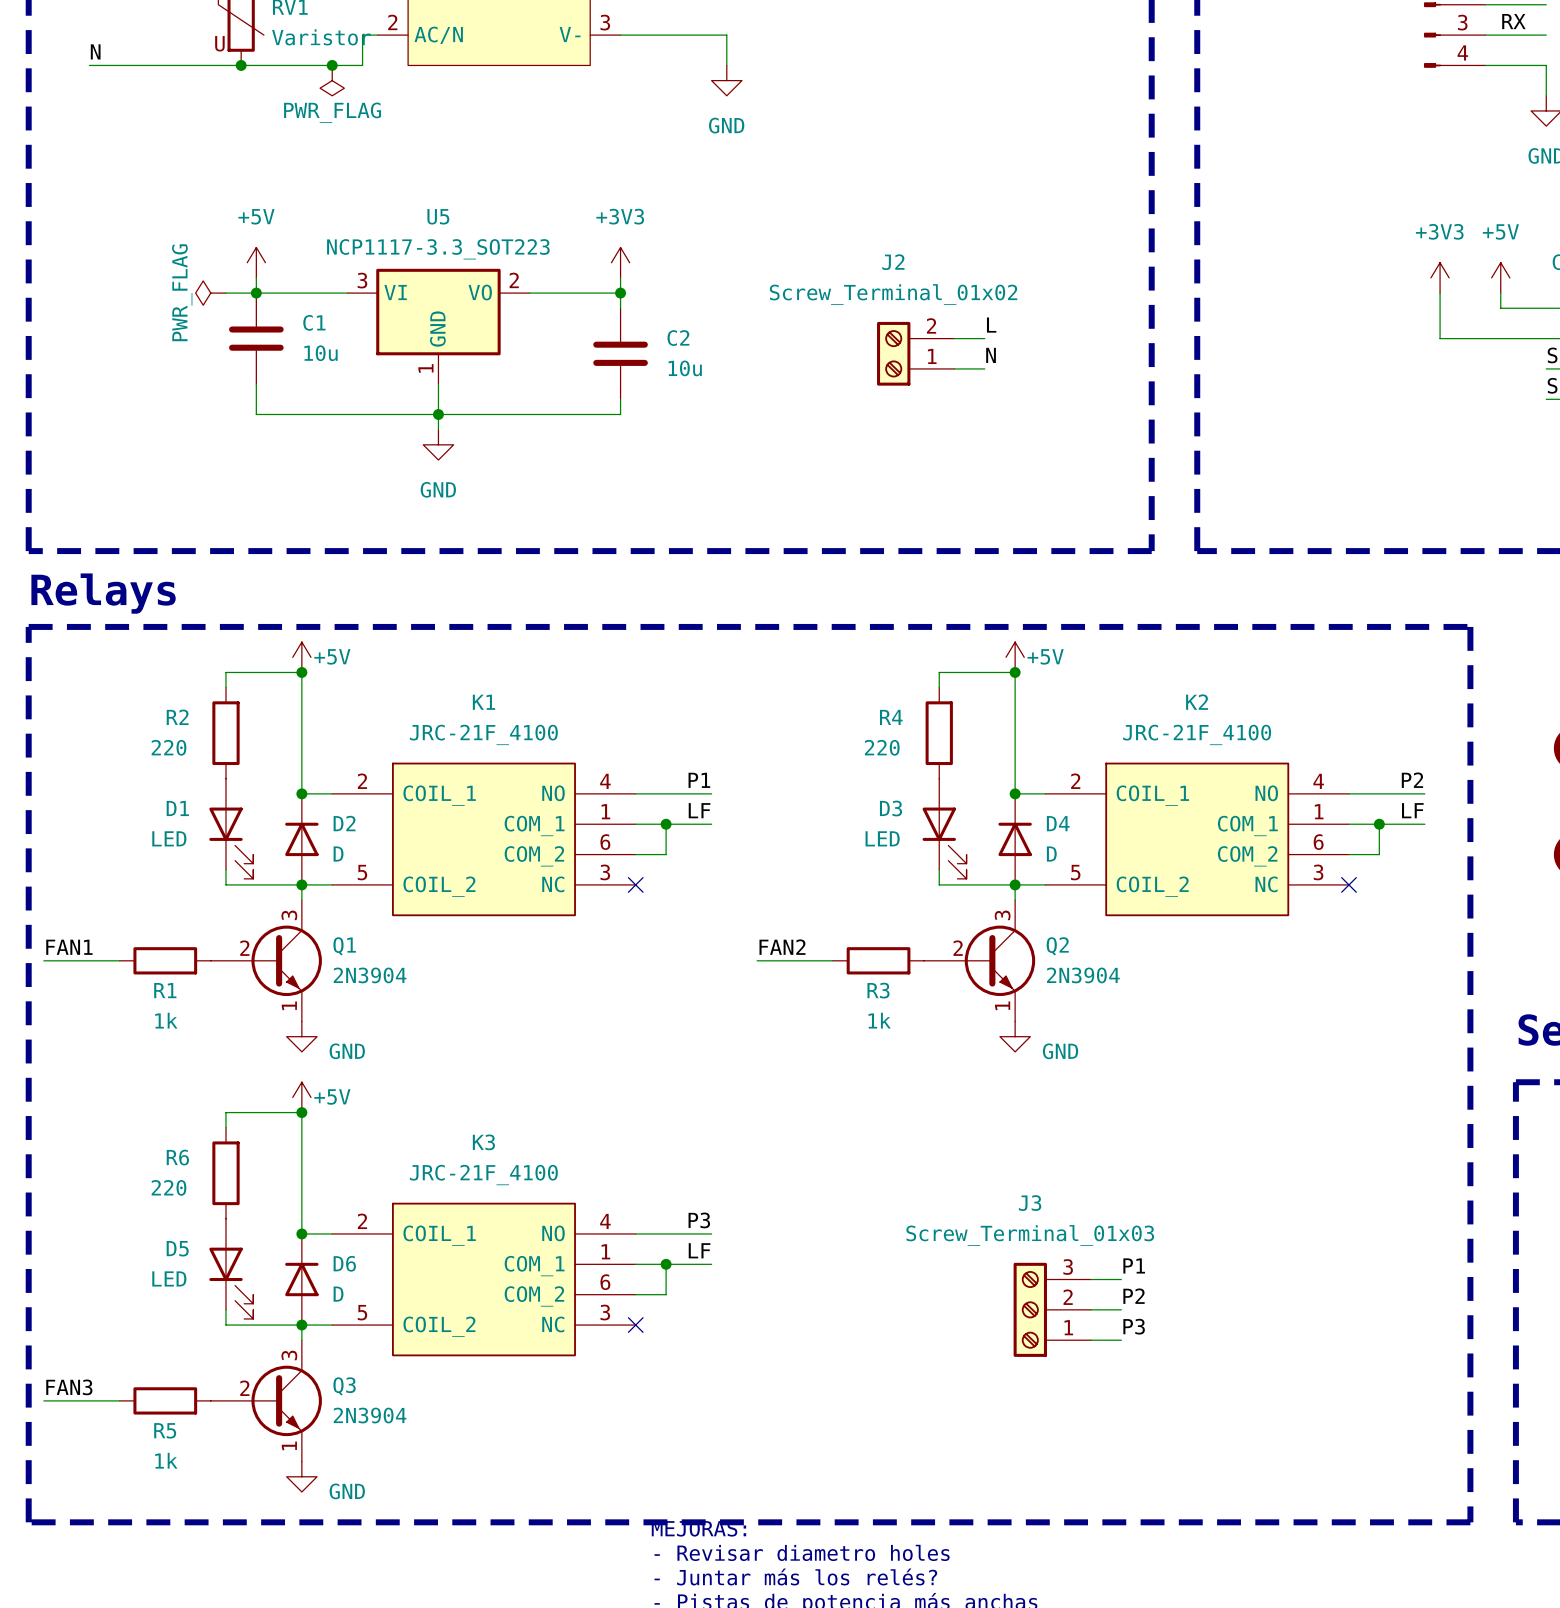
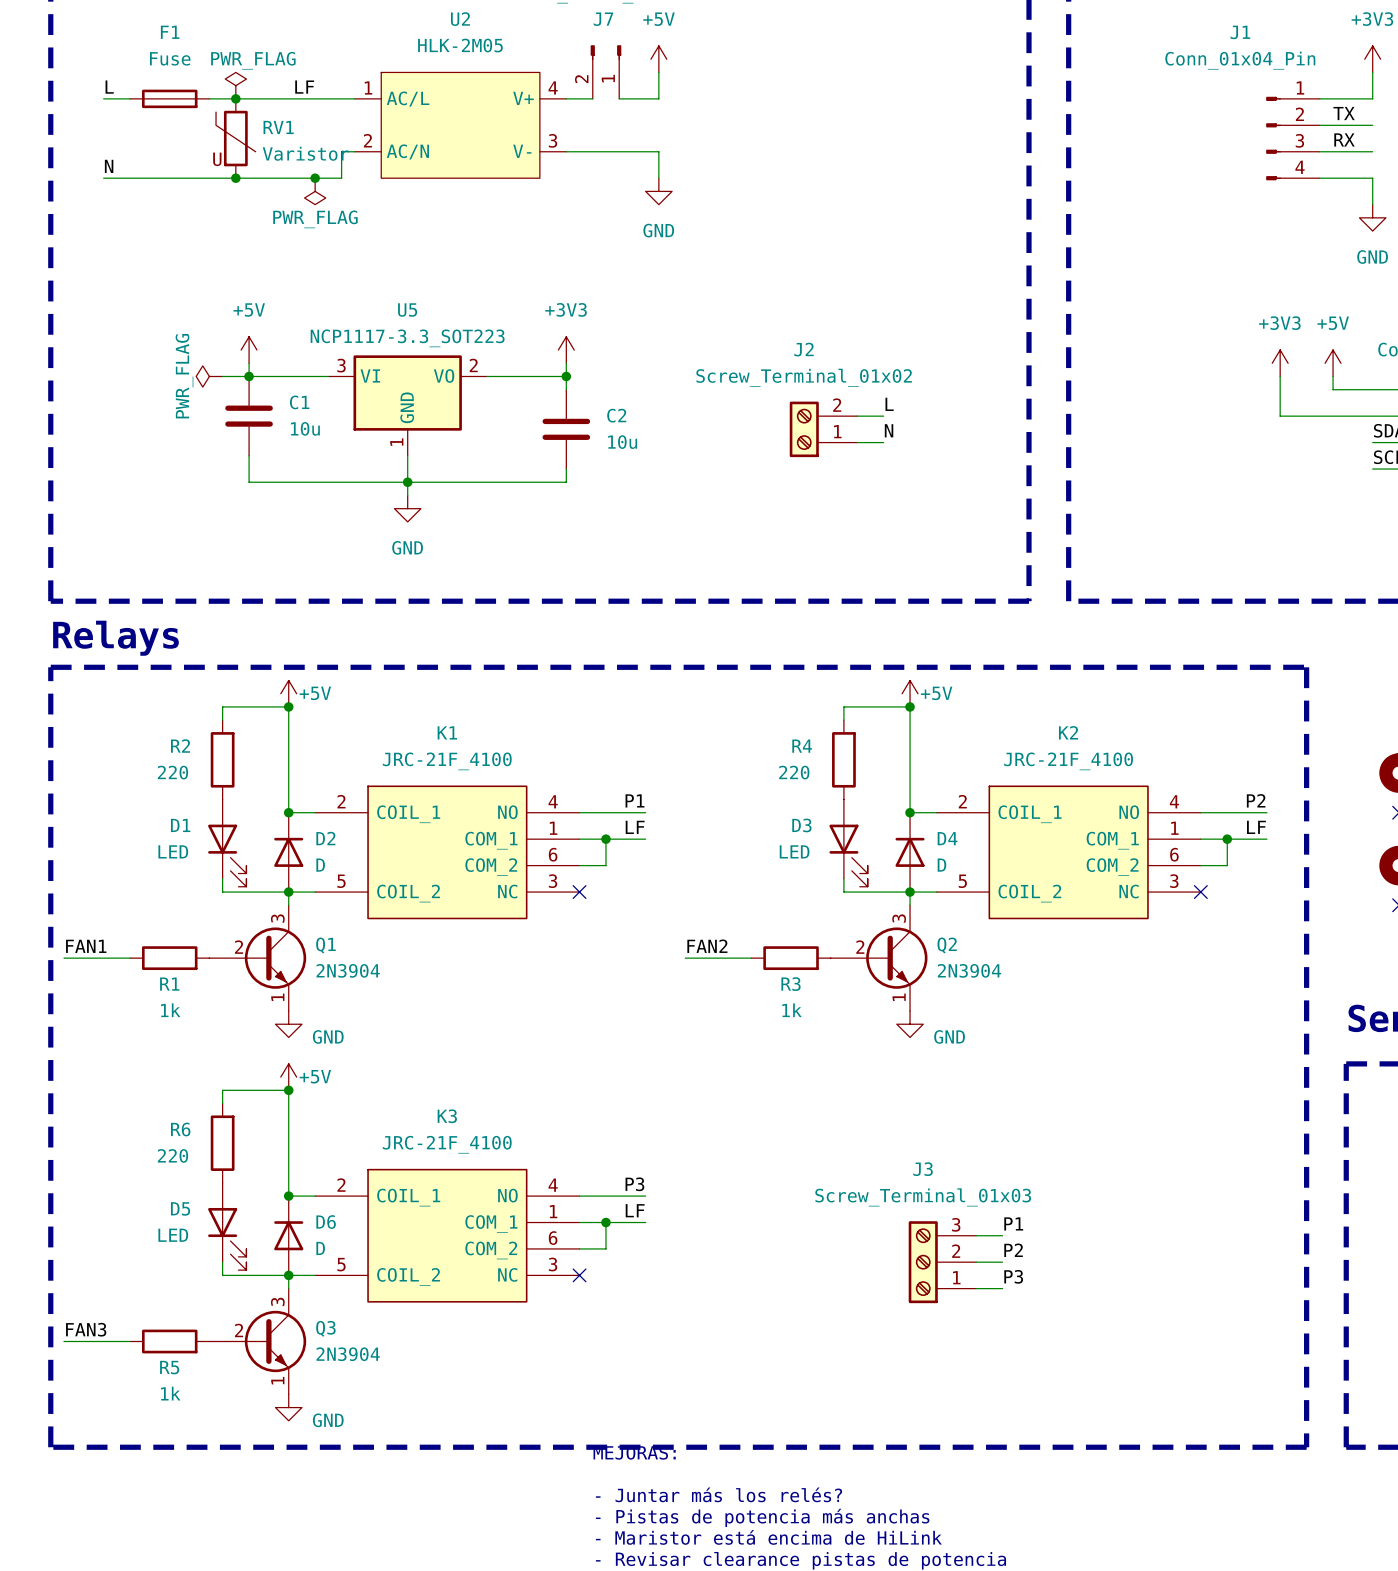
text: - Revisar diametro holes (802, 1552) -> none

